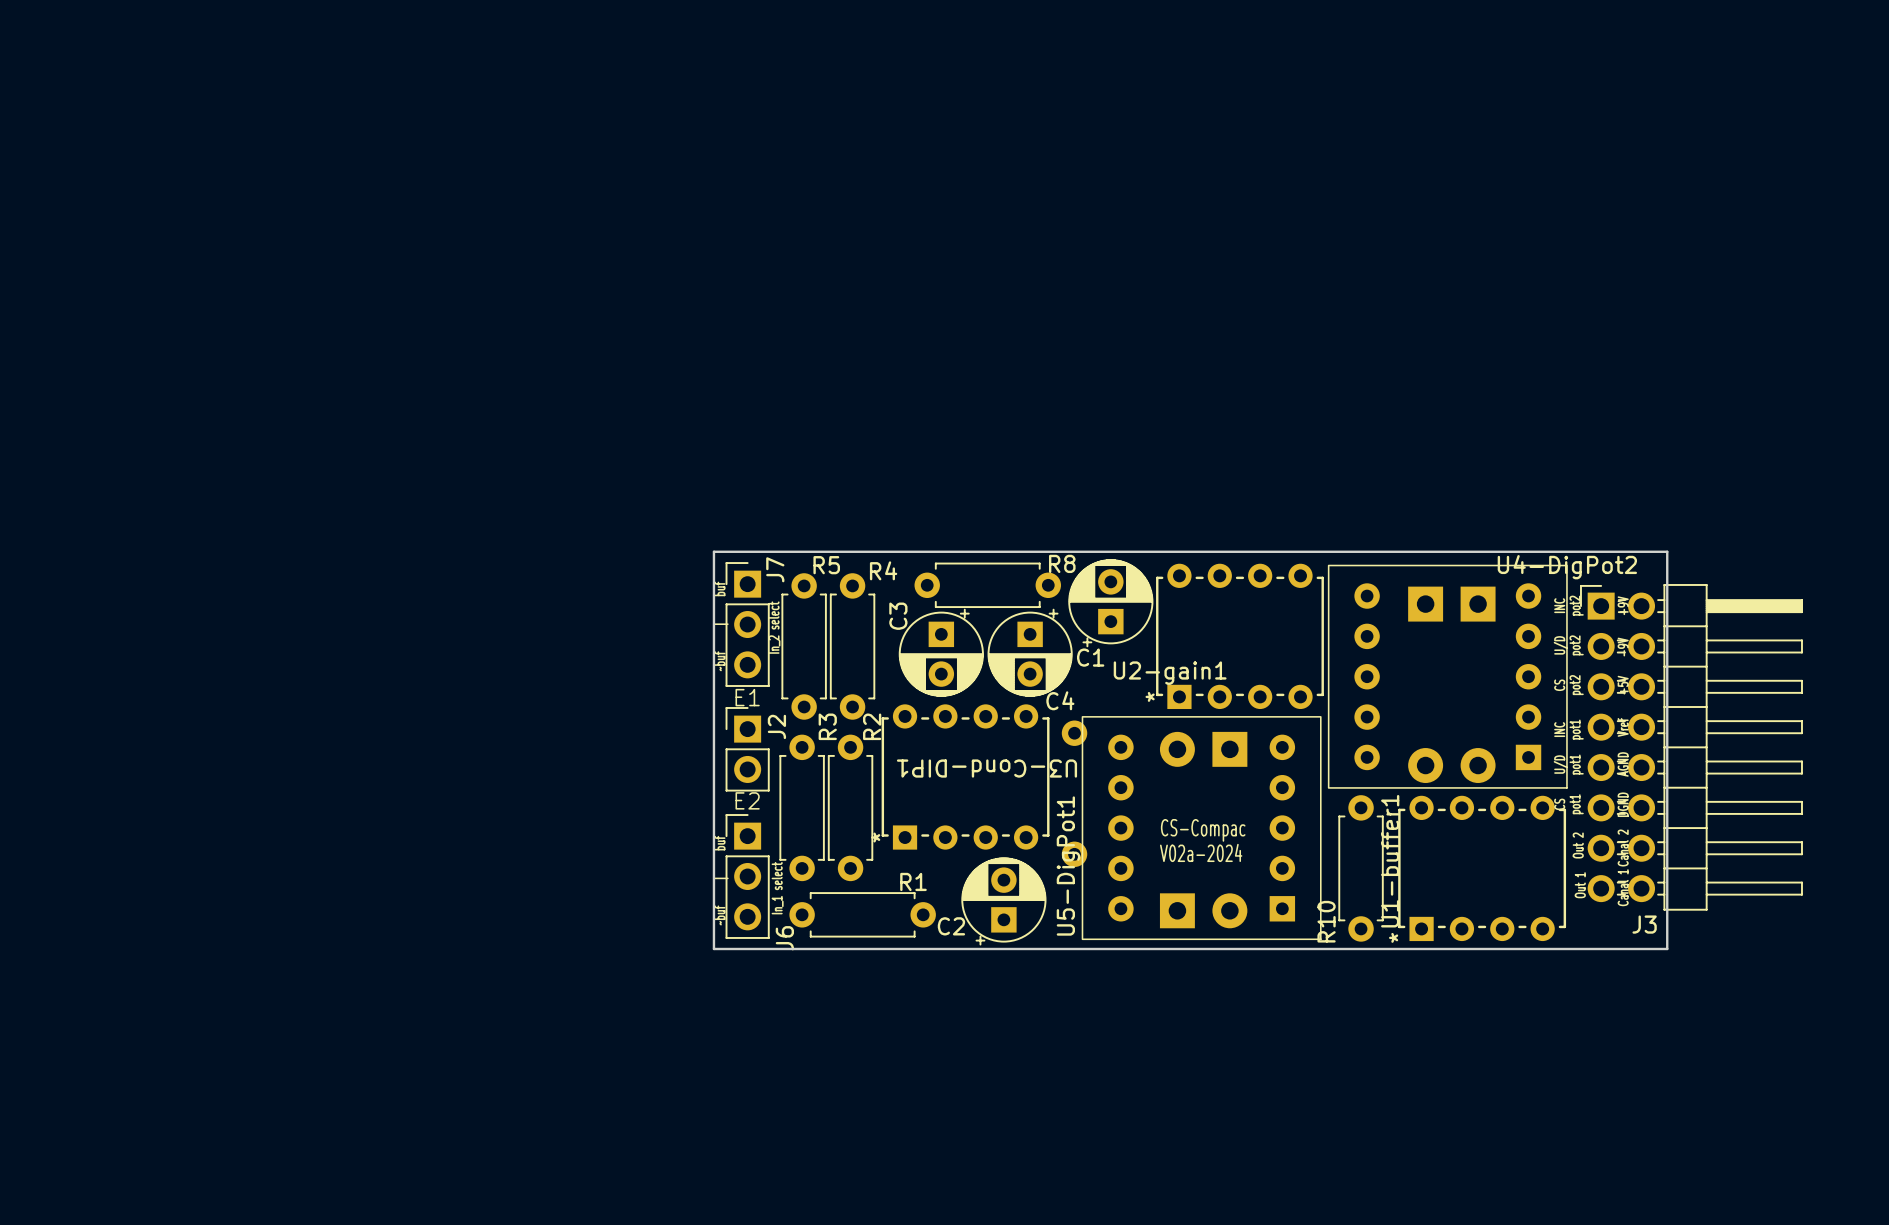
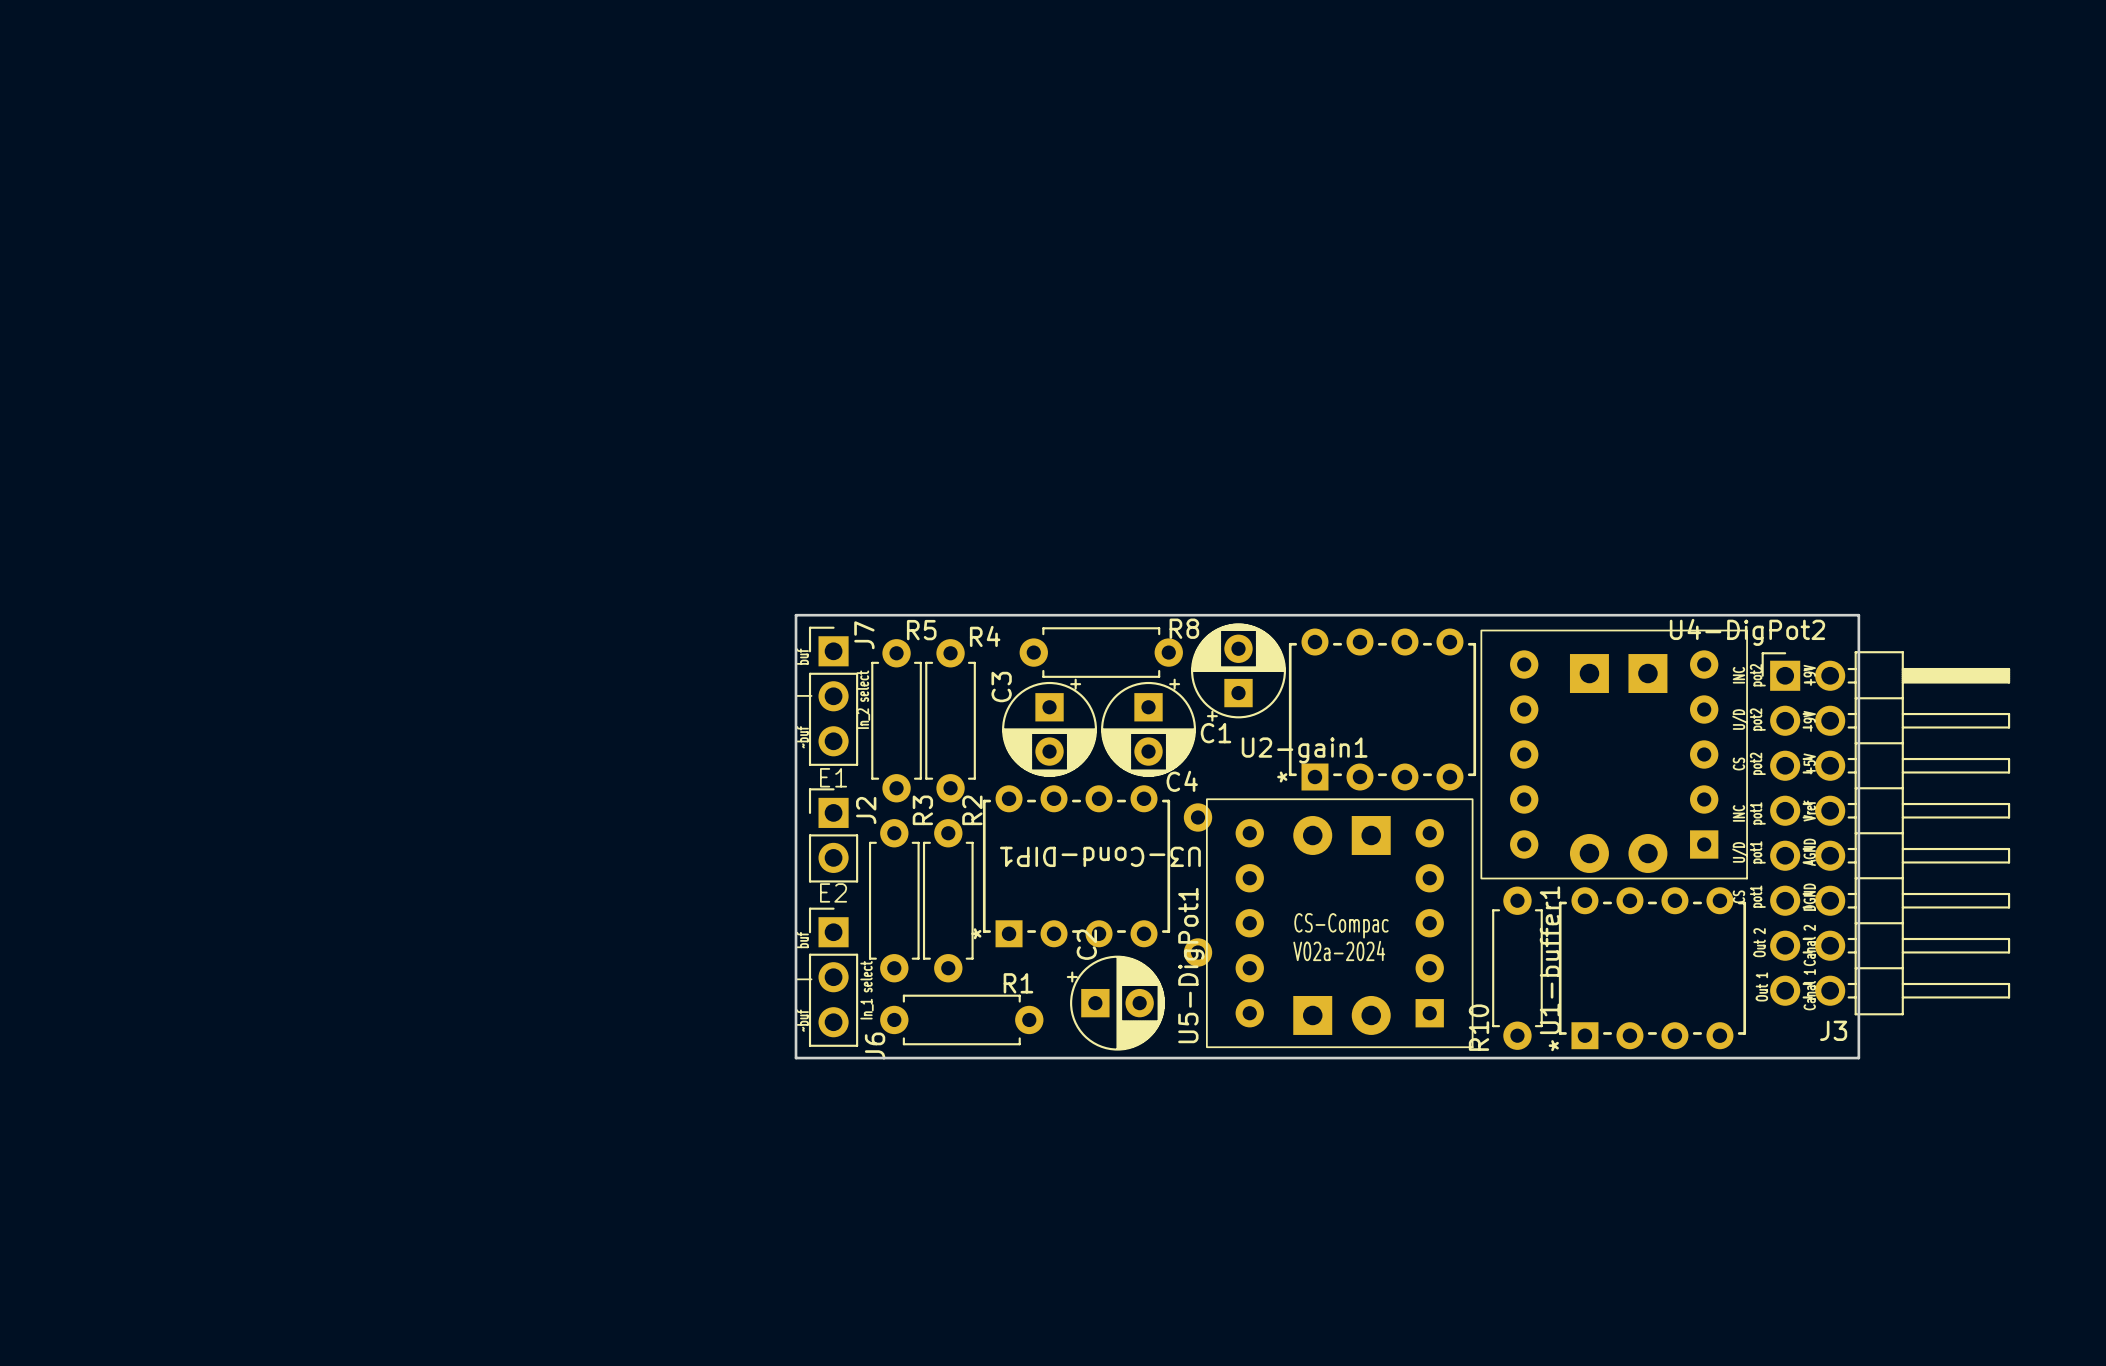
C2 rotation: 0° (1003, 901) -> 90° clockwise (1115, 1003)

